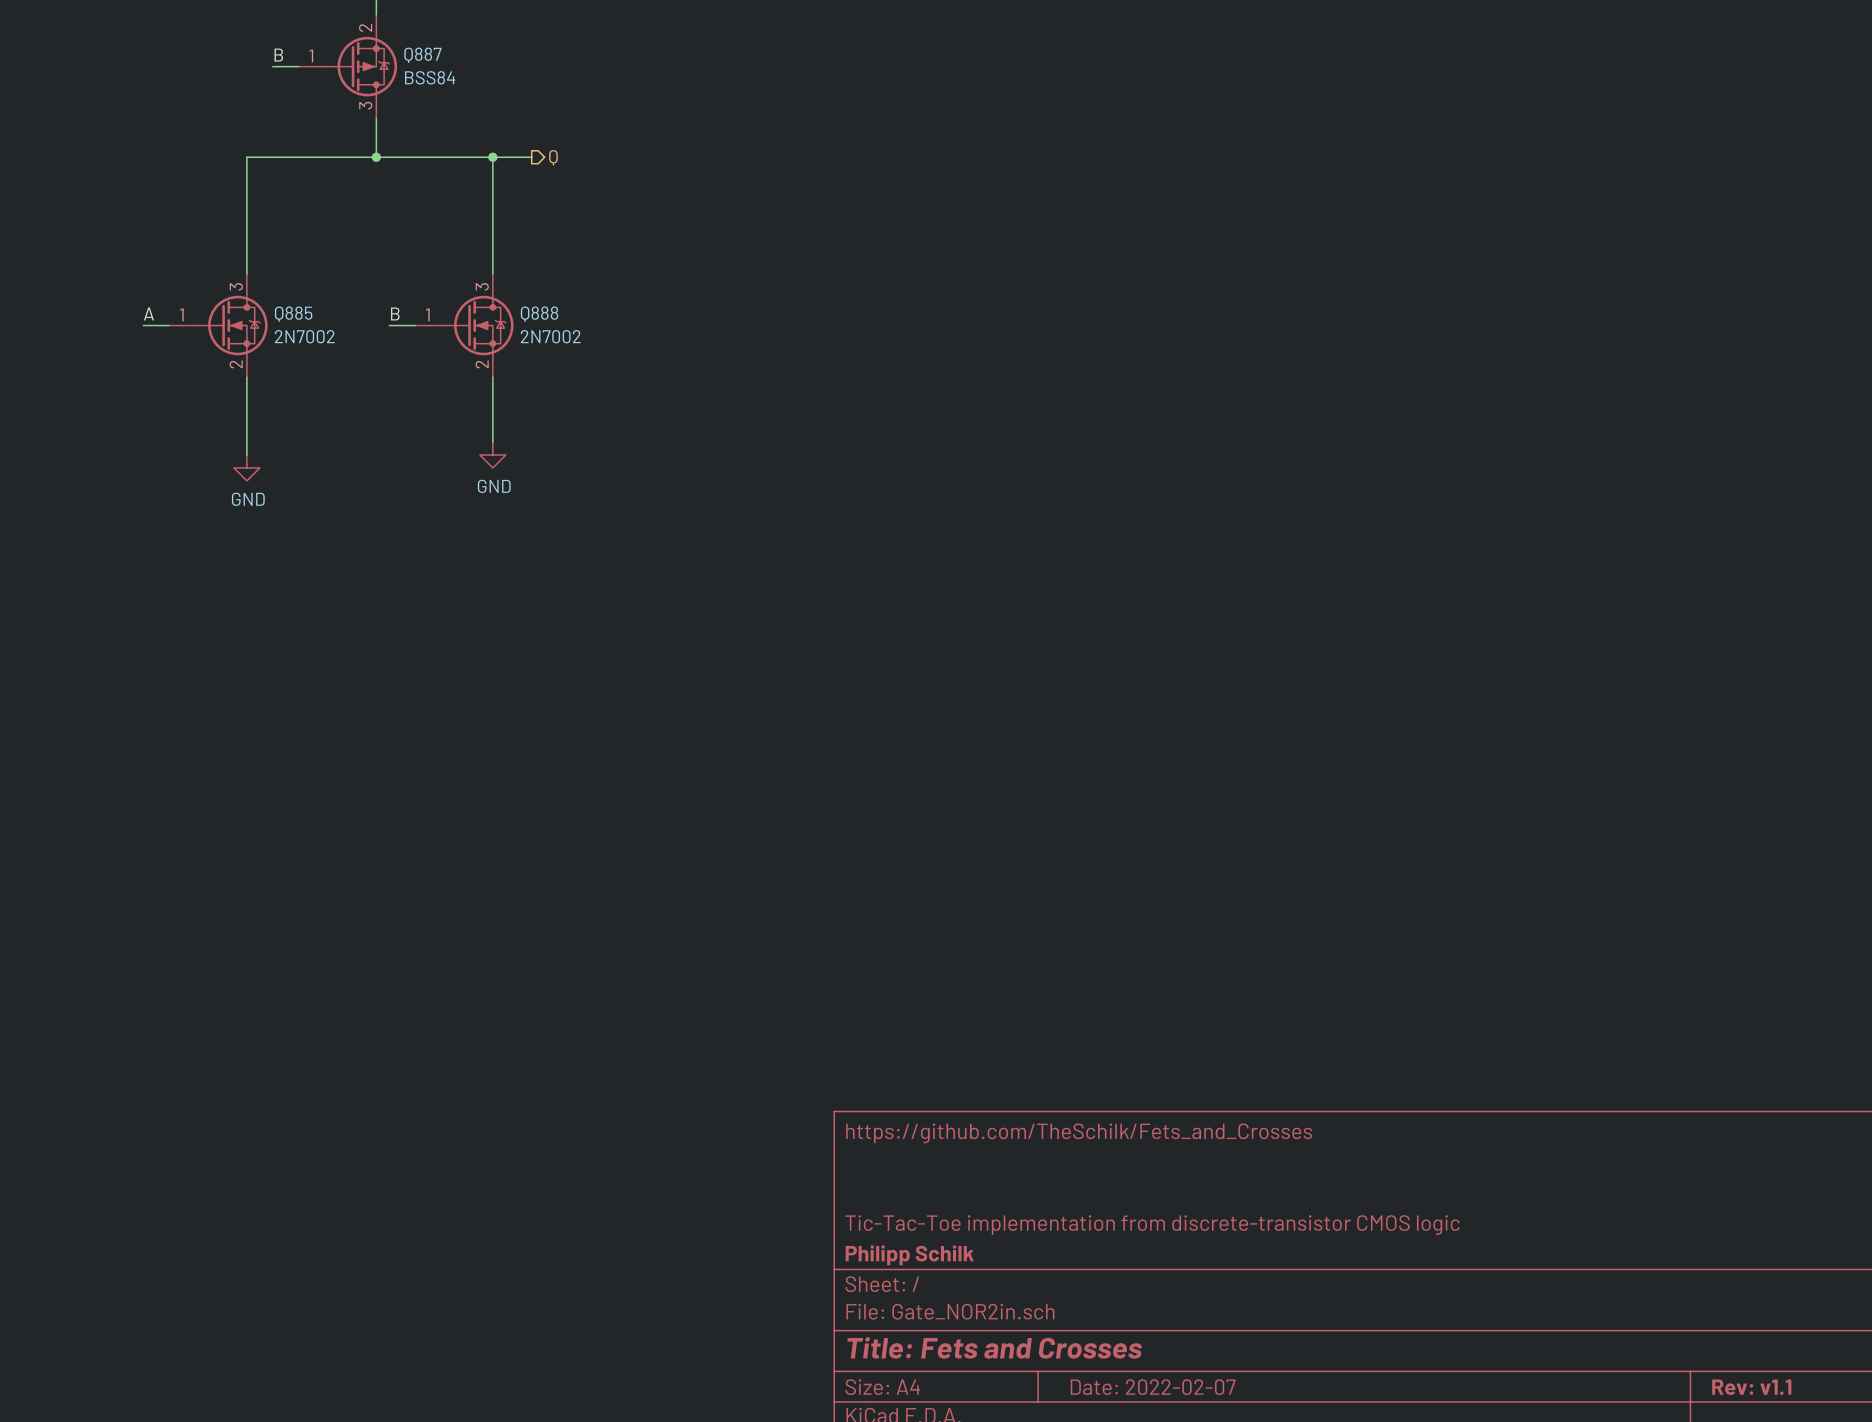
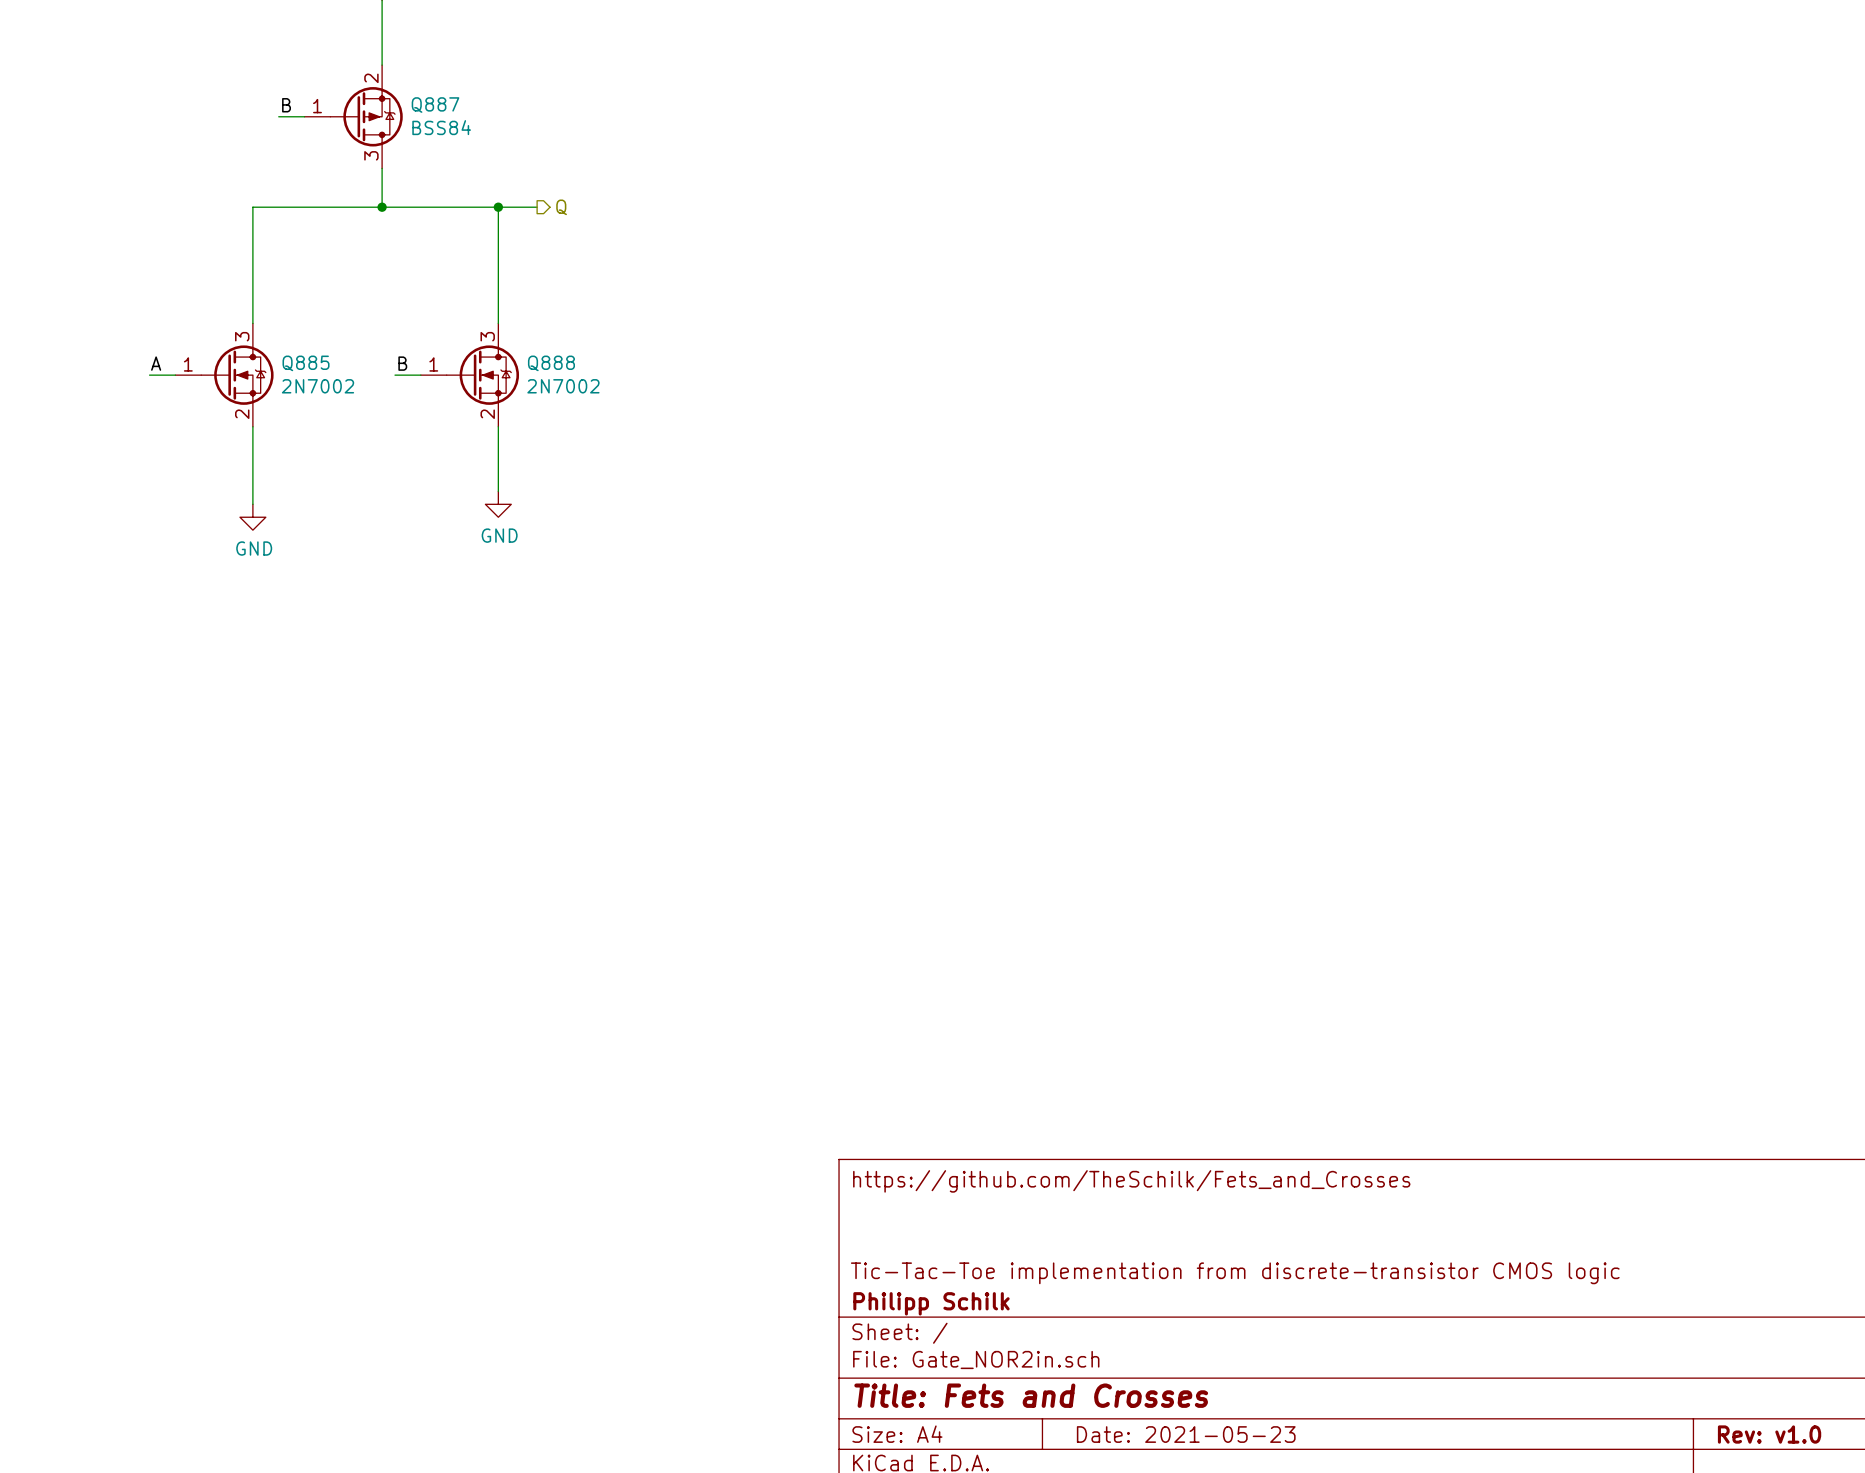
title block: Date: 2022-02-07 (1153, 1387) -> Date: 2021-05-23 (1186, 1434)
title block: Rev: v1.1 (1751, 1387) -> Rev: v1.0 (1769, 1434)

